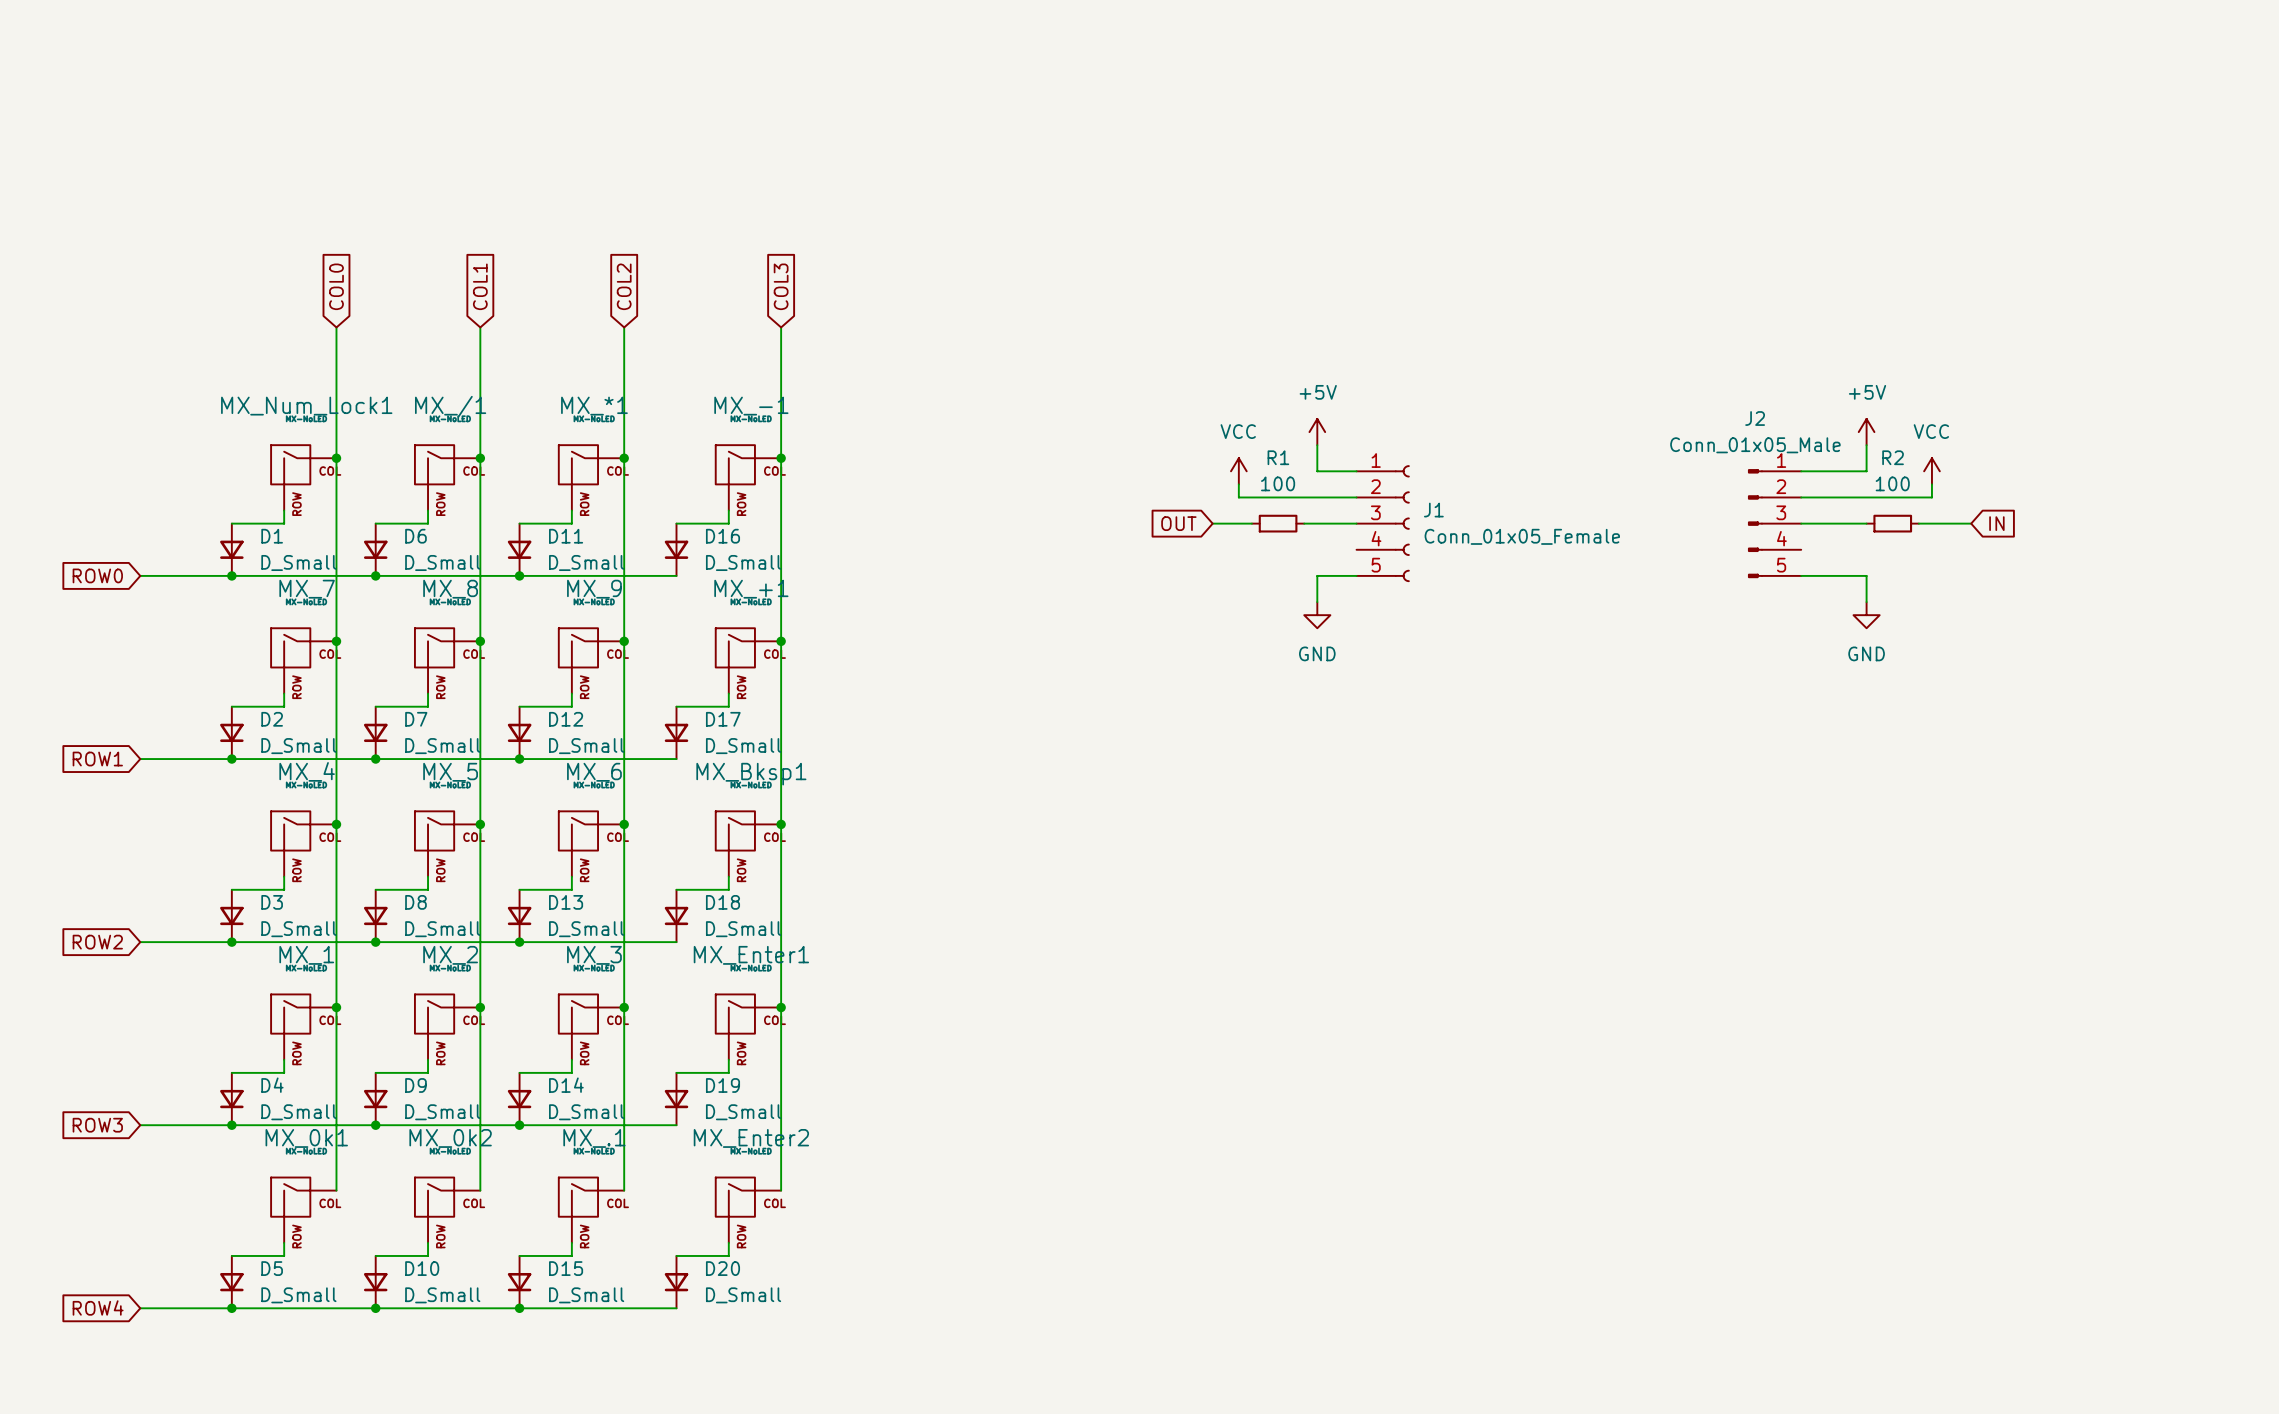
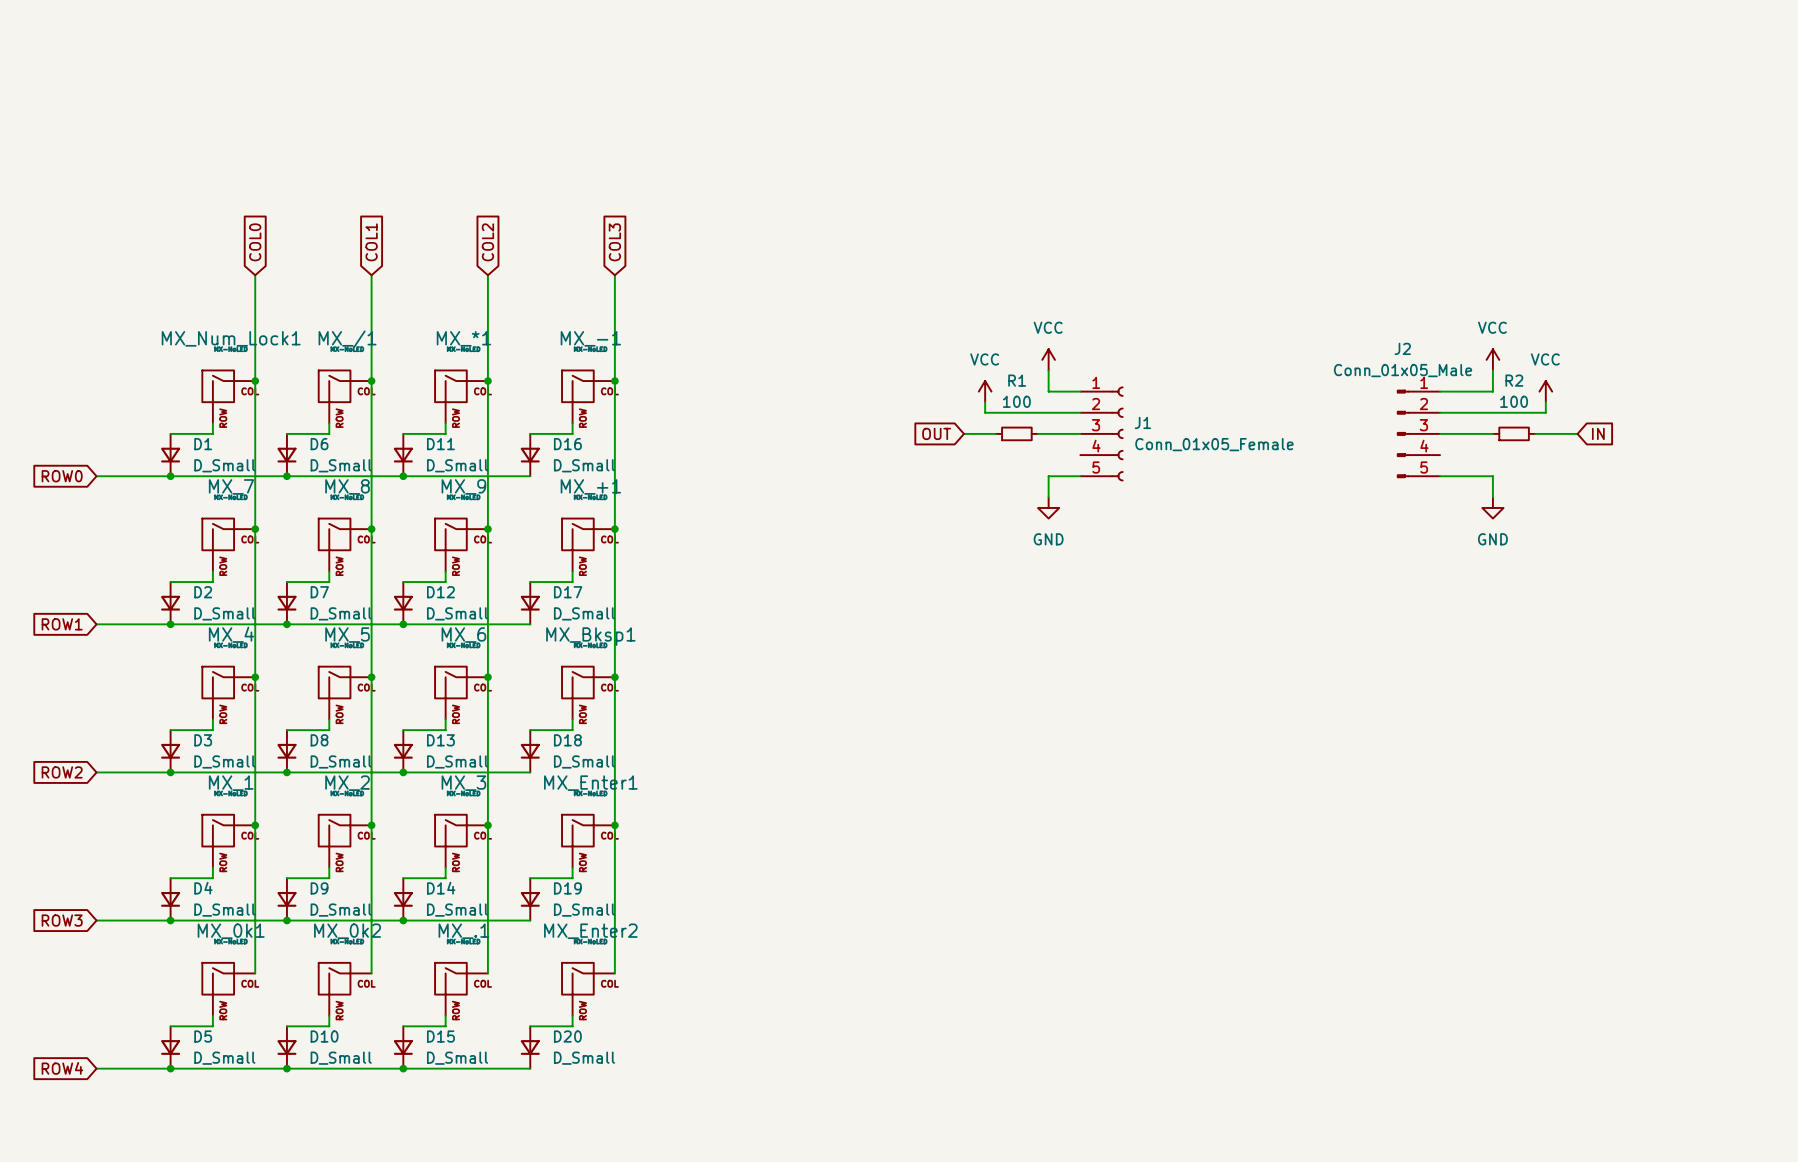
power symbol: +5V (1317, 432) -> VCC (1048, 359)
power symbol: +5V (1866, 432) -> VCC (1492, 359)

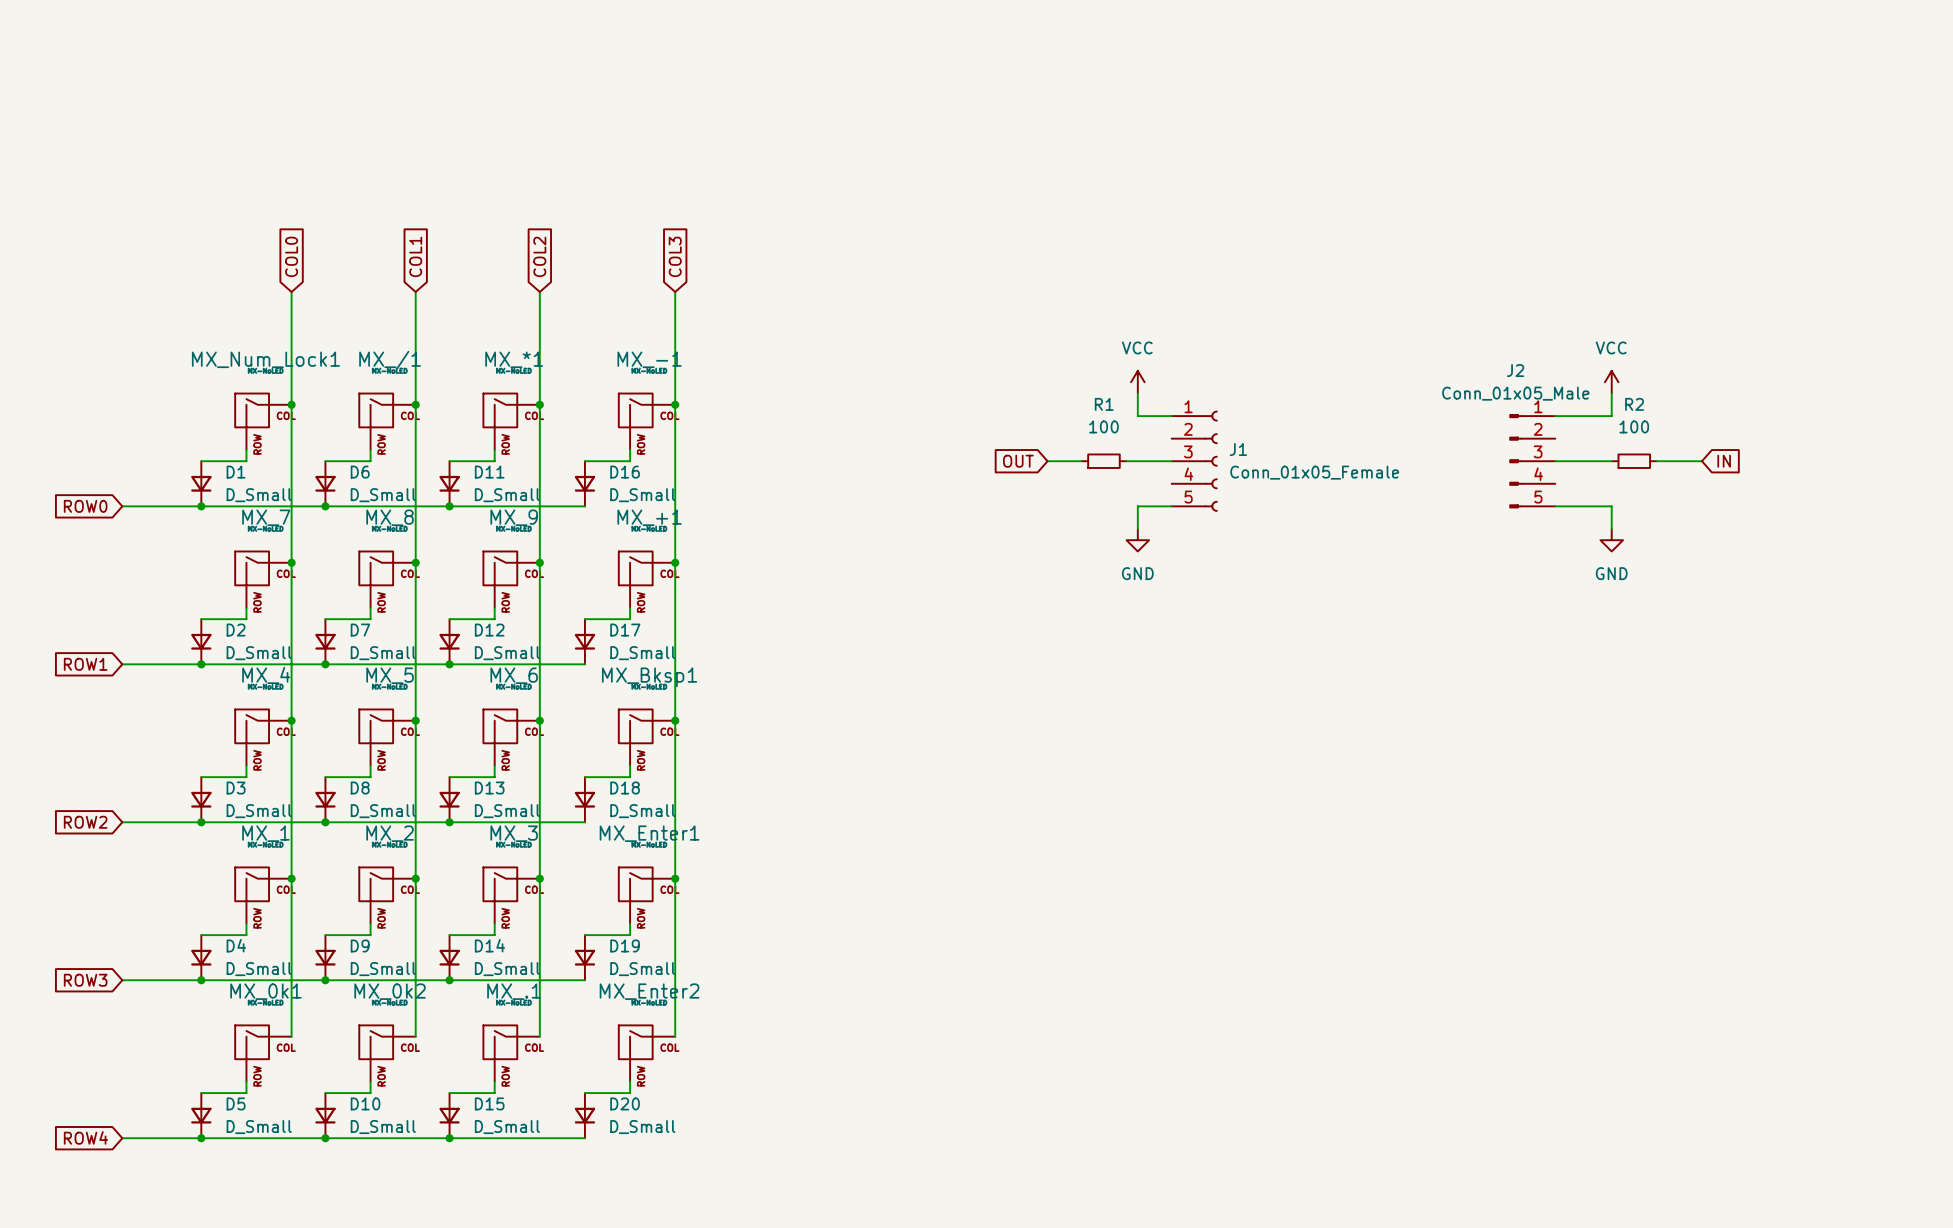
power symbol: VCC (985, 391) -> none
power symbol: VCC (1545, 391) -> none
wire: (985, 402) (985, 412) (1080, 412) -> none
wire: (1545, 402) (1545, 412) (1440, 412) -> none

